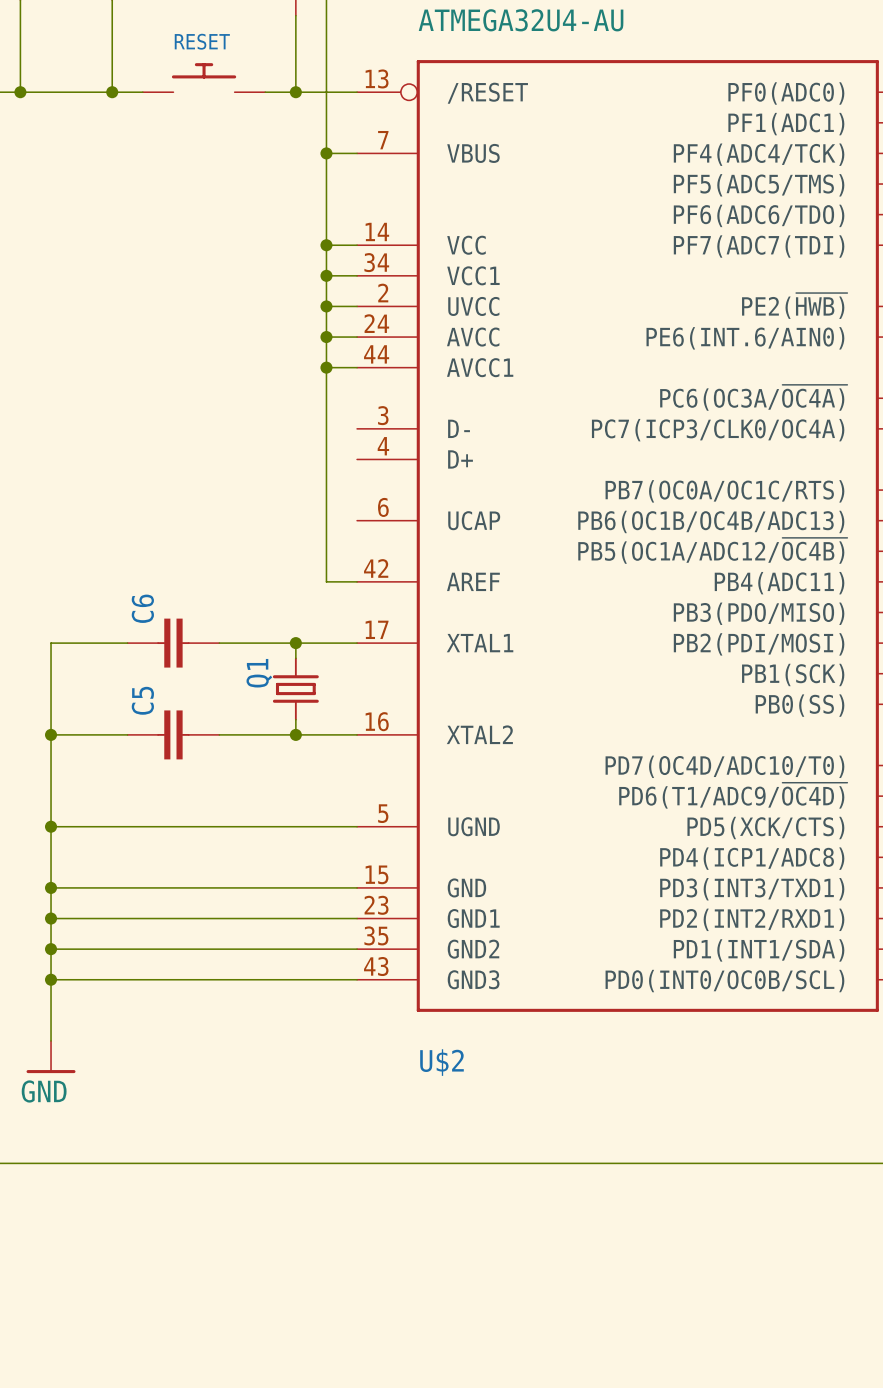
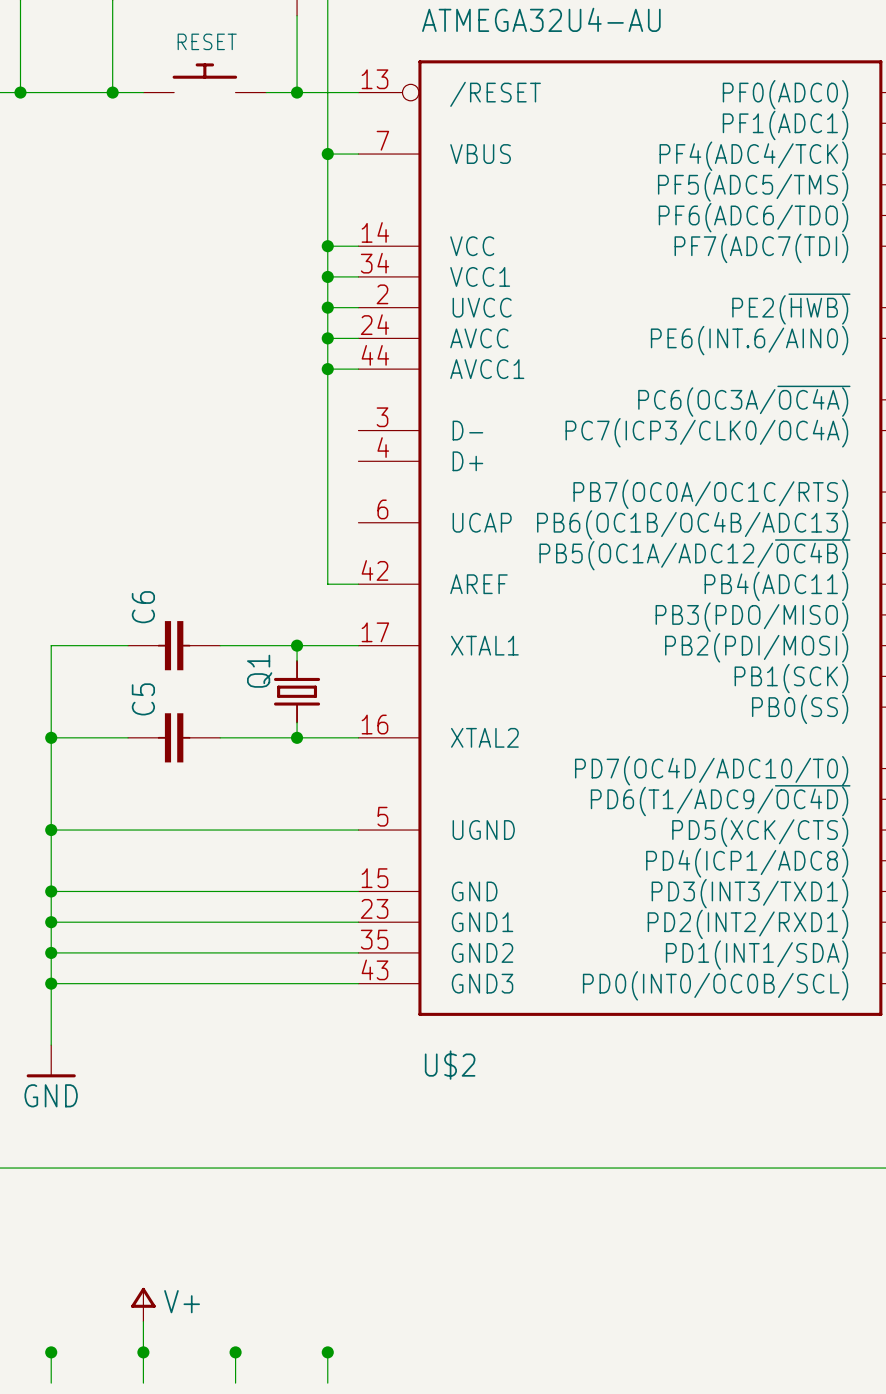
power symbol: none -> V+ (143, 1304)
wire: none -> (143, 1321) (143, 1383)
wire: none -> (51, 1352) (51, 1383)
junction: none -> (51, 1352)
junction: none -> (143, 1352)
wire: none -> (235, 1352) (235, 1383)
junction: none -> (235, 1352)
wire: none -> (327, 1352) (327, 1383)
junction: none -> (327, 1352)

